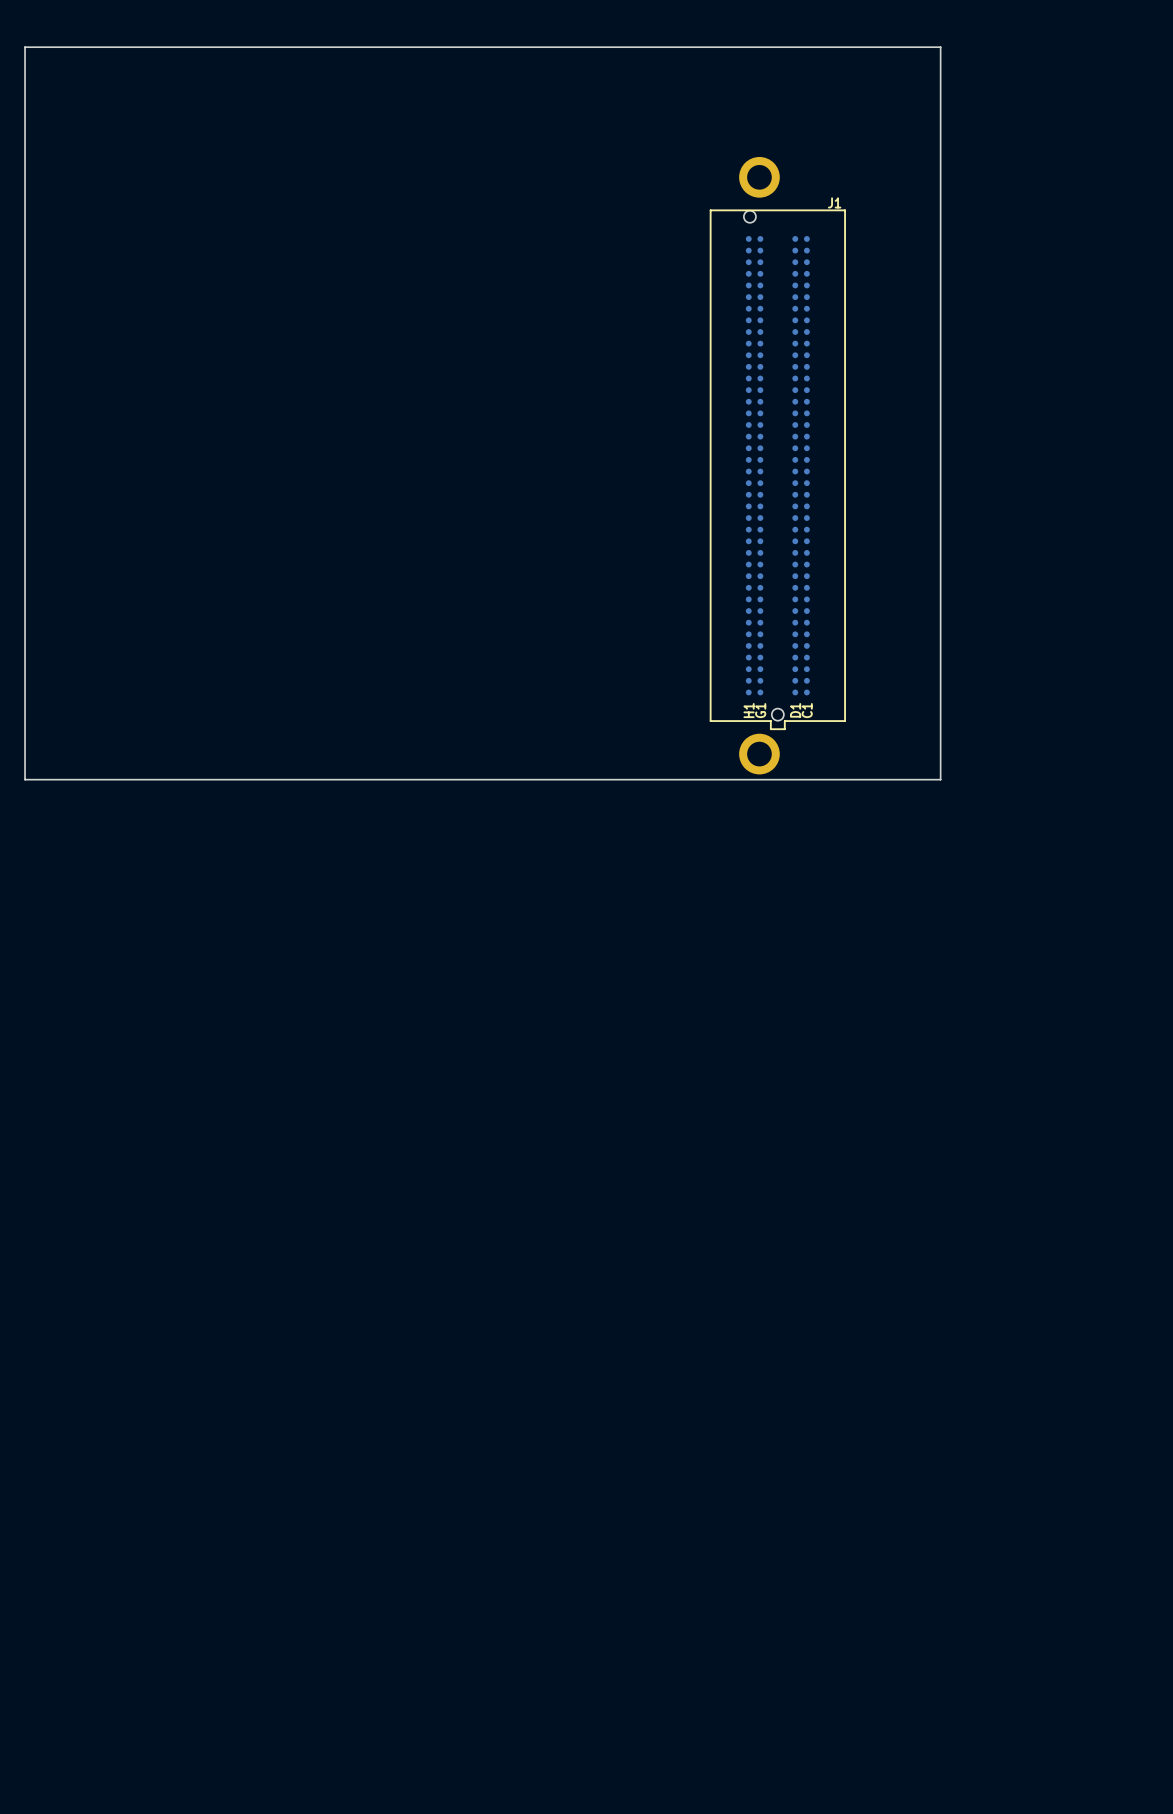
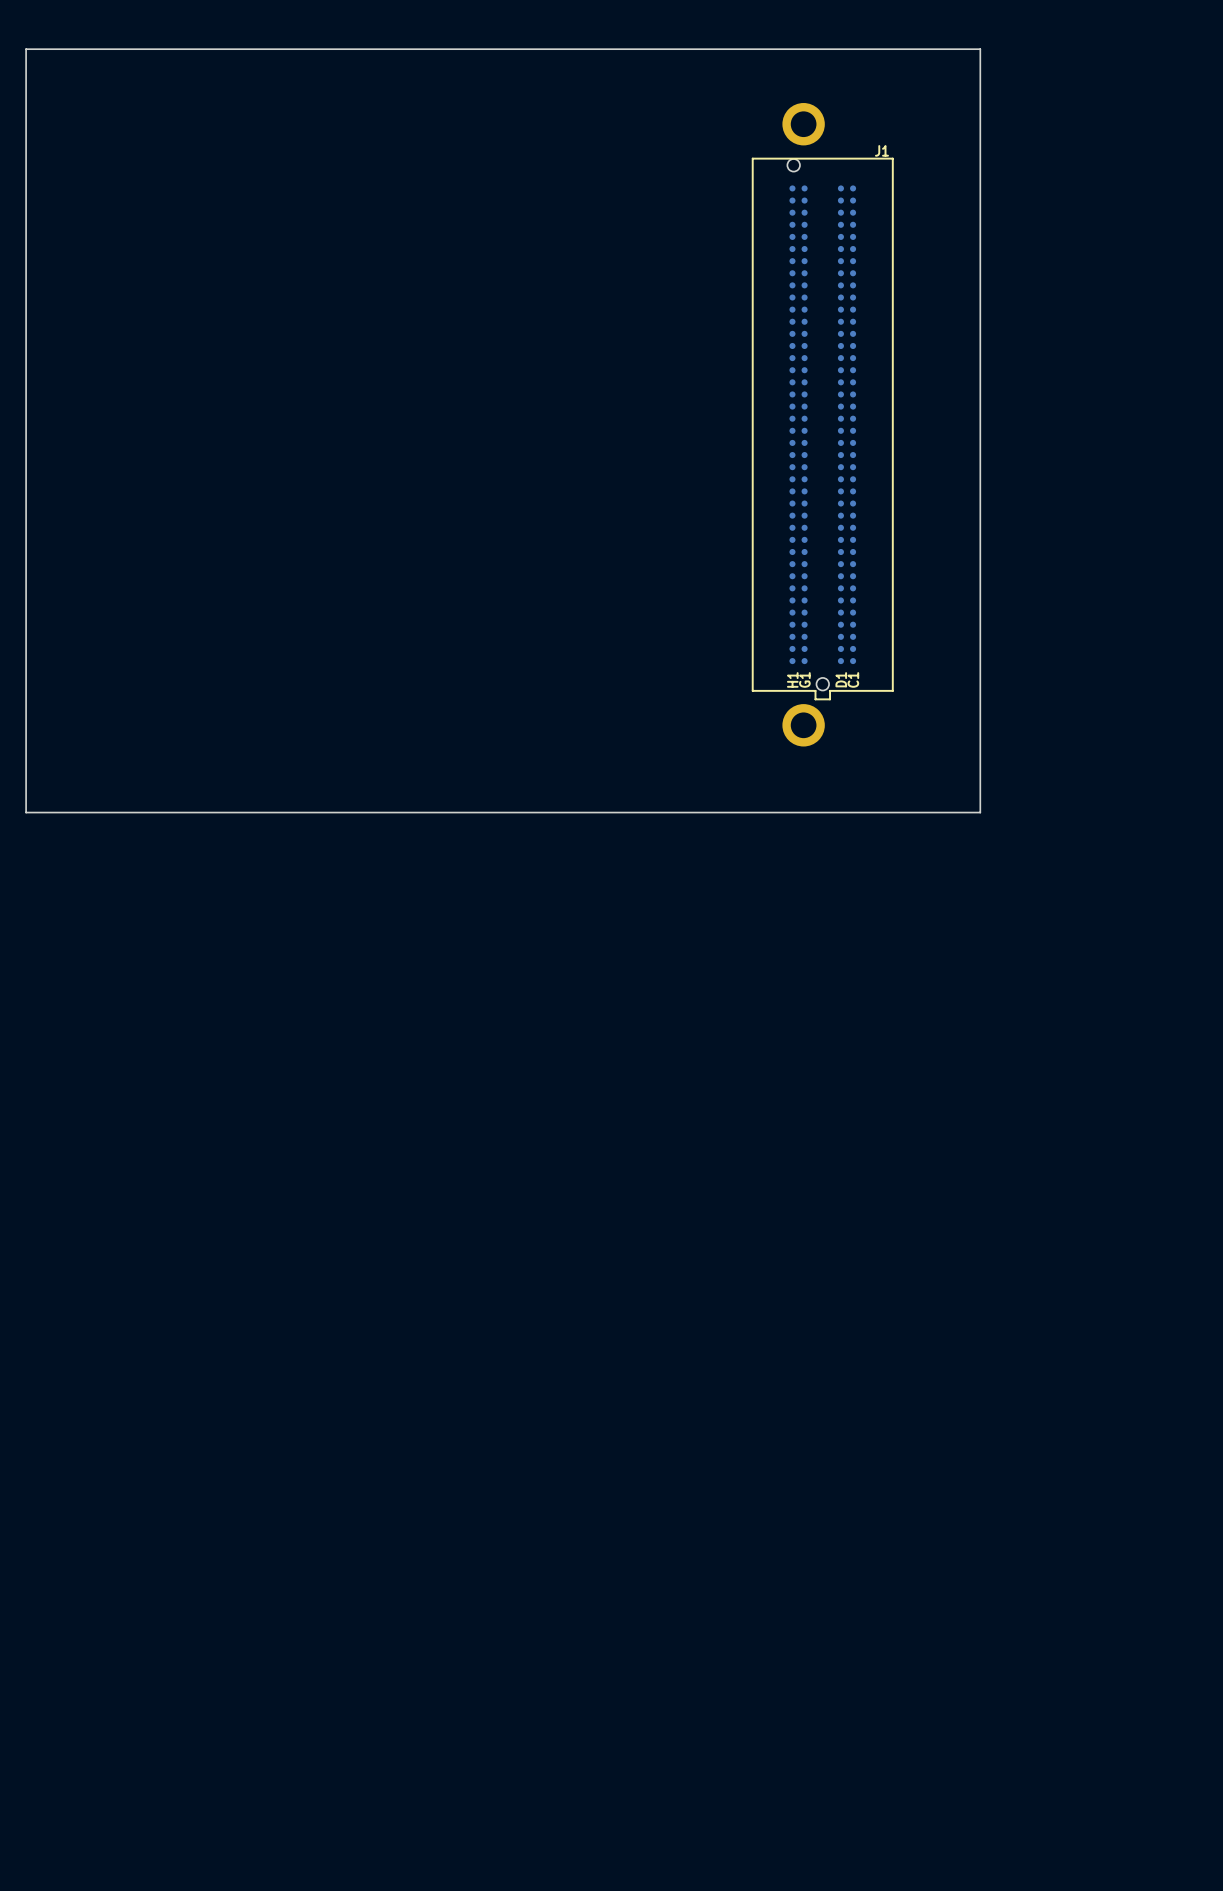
J1 position: (777, 465) -> (822, 424)

